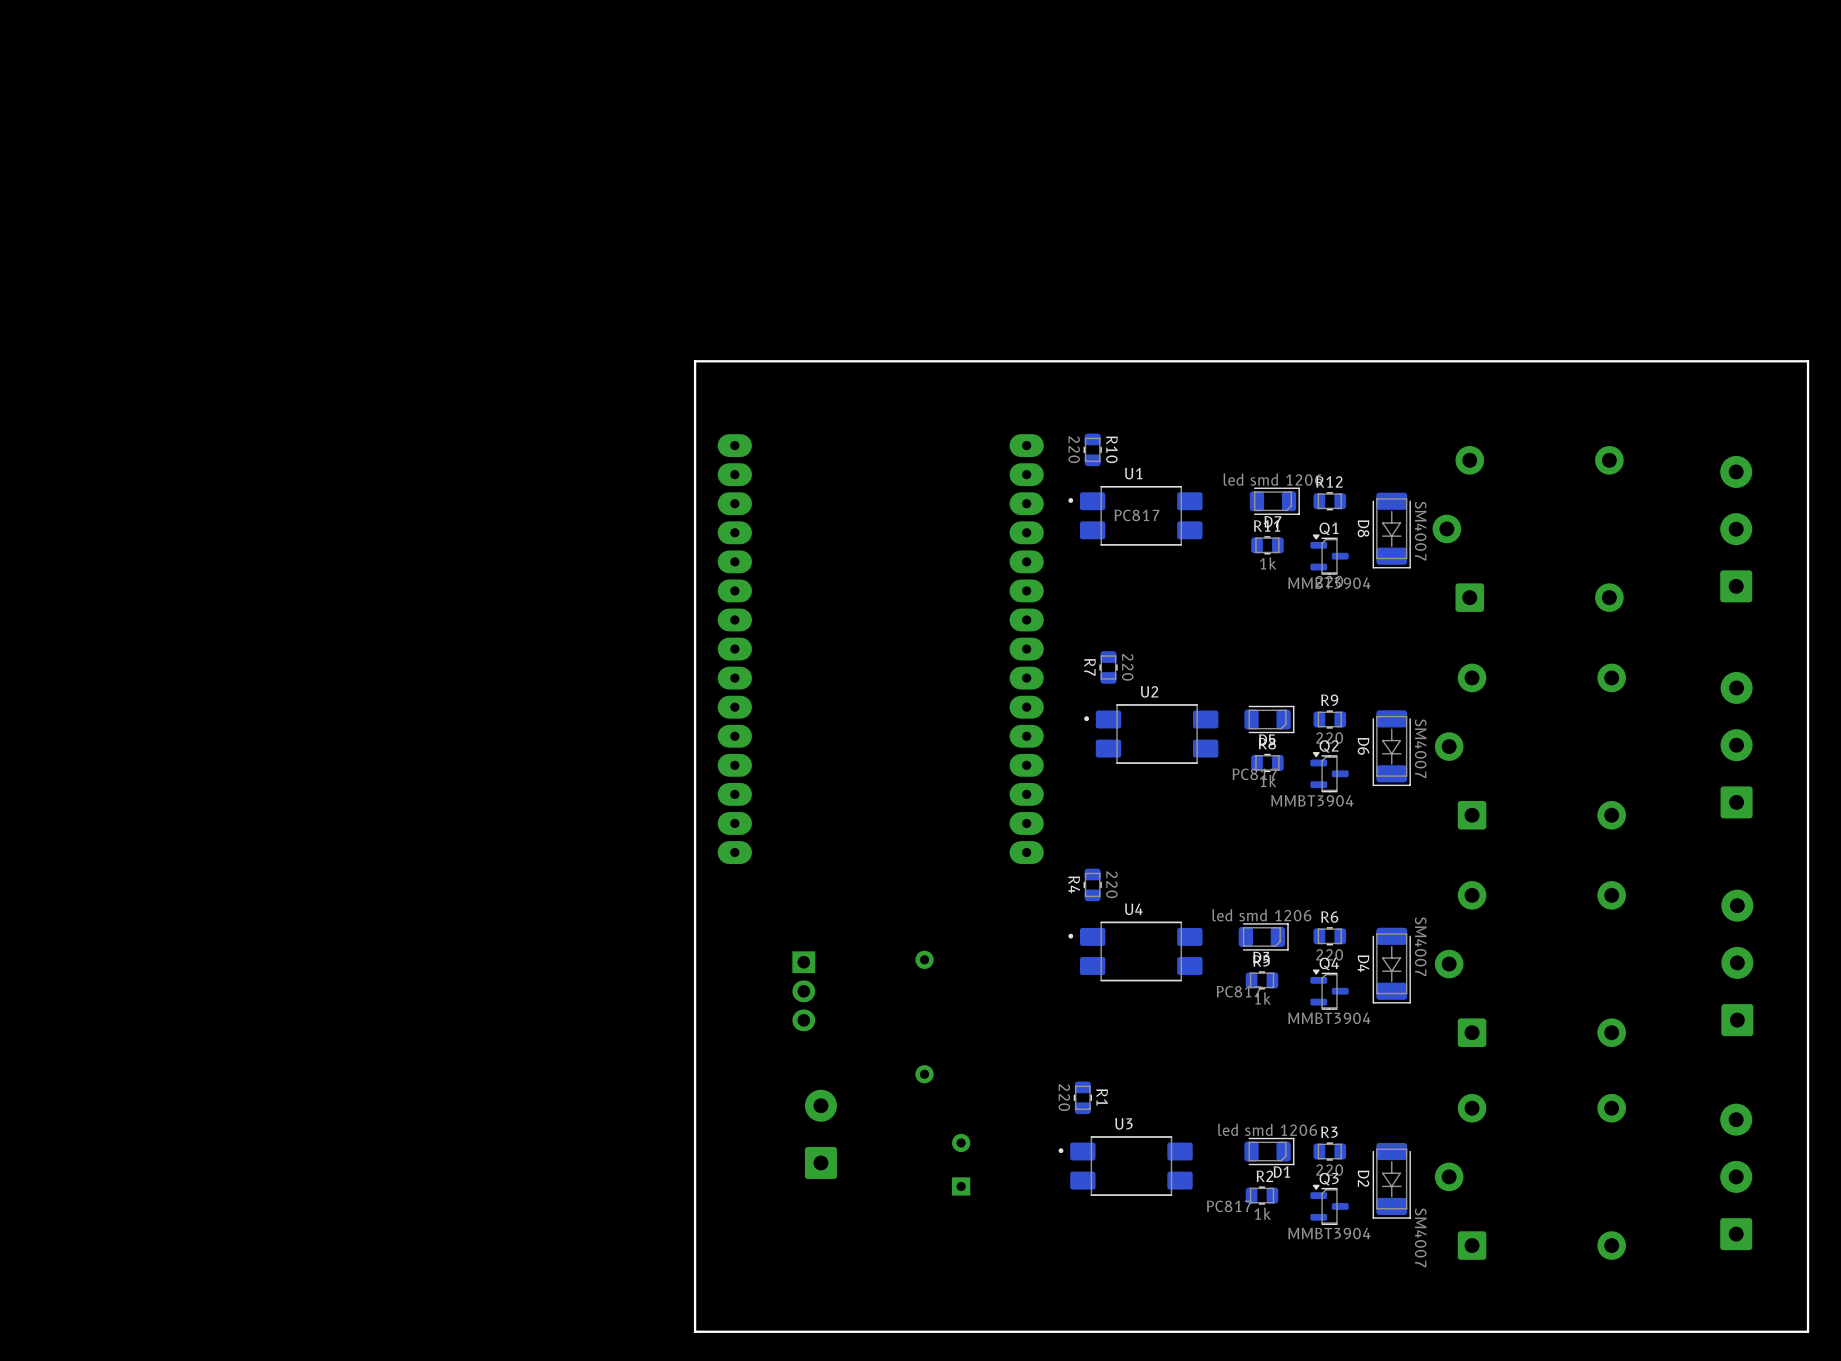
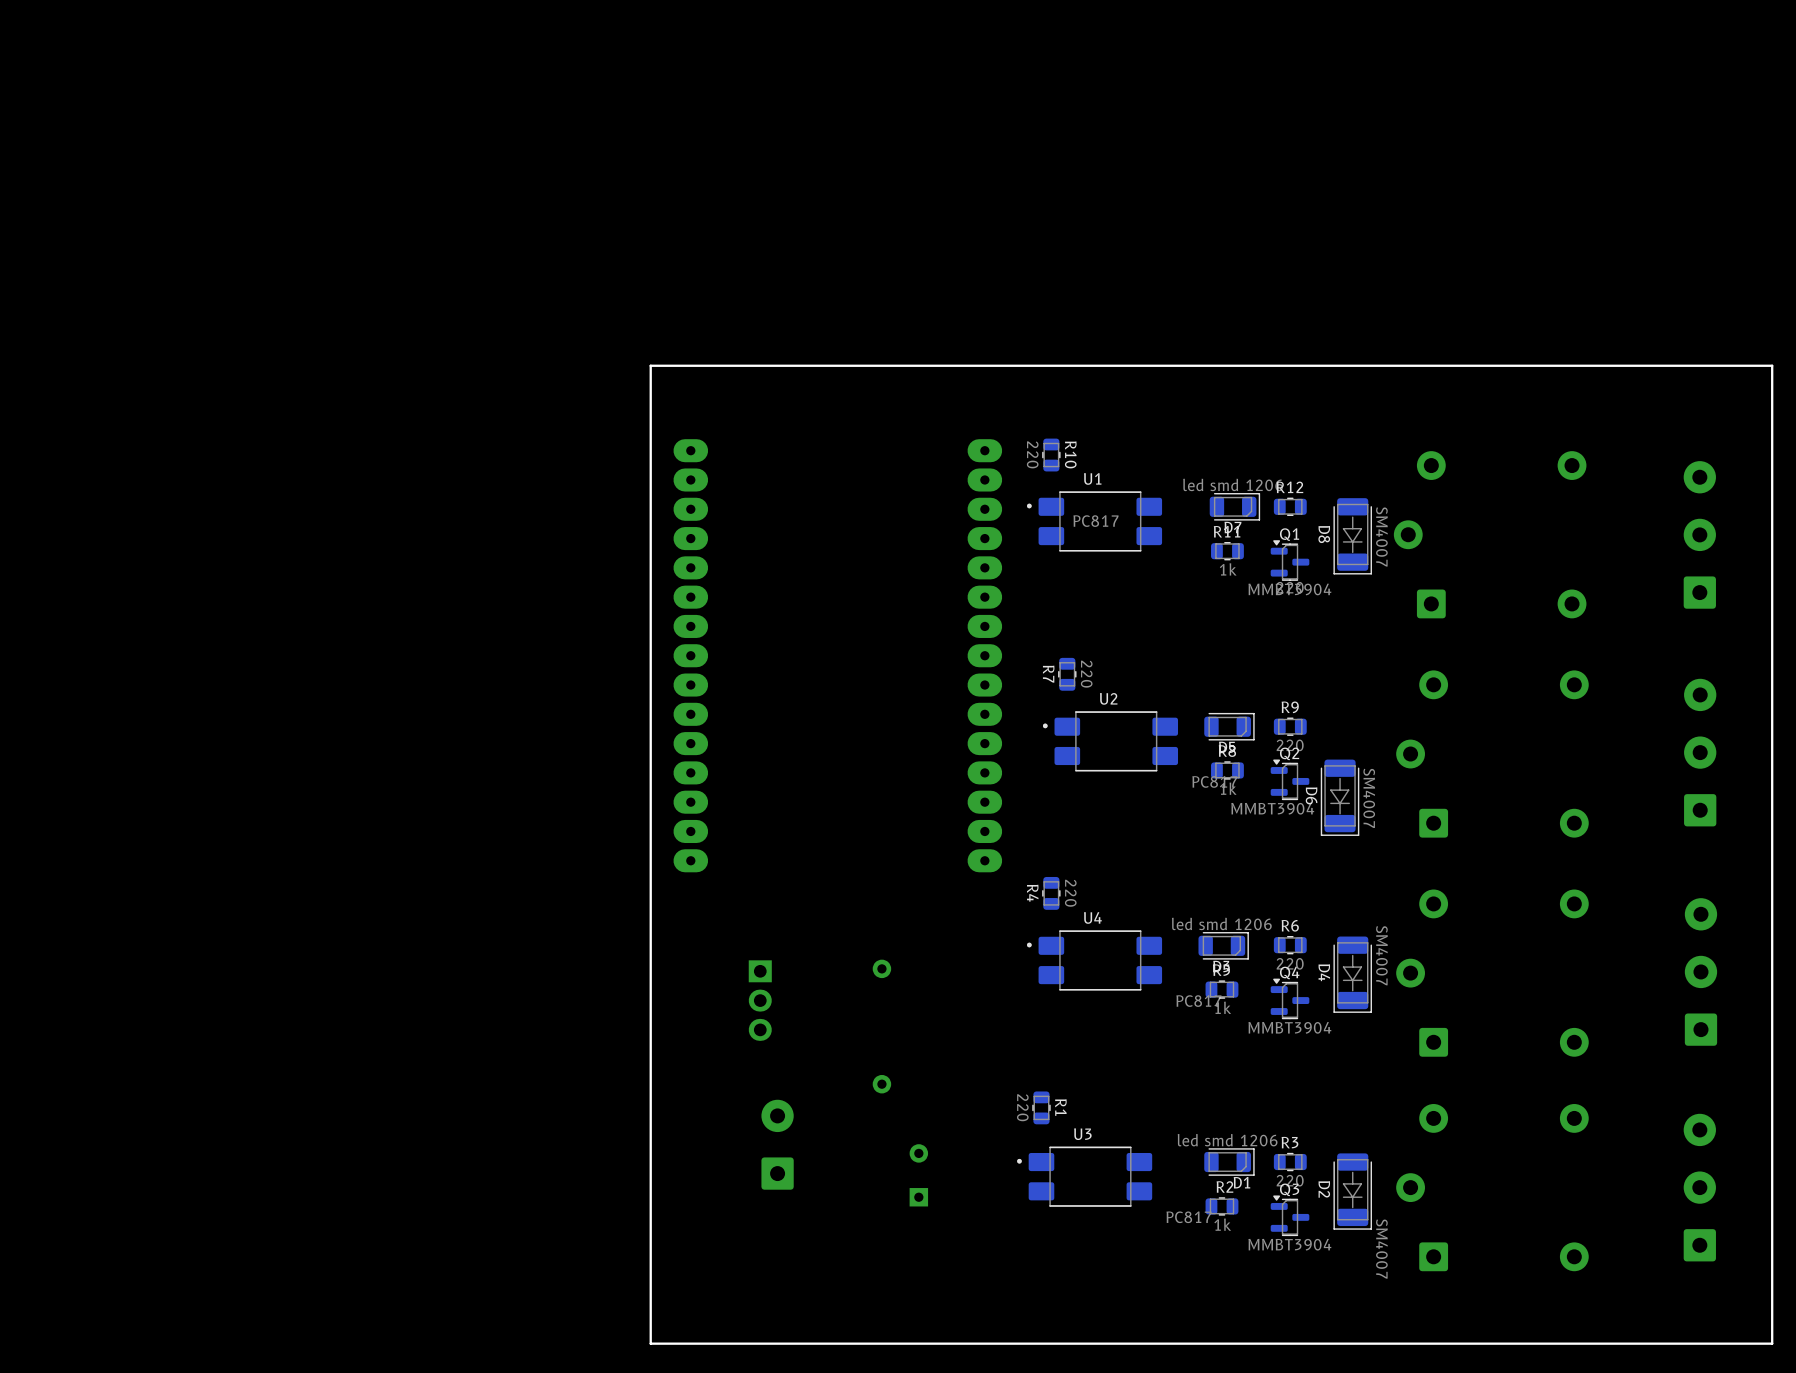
D6 position: (1391, 748) -> (1340, 797)

